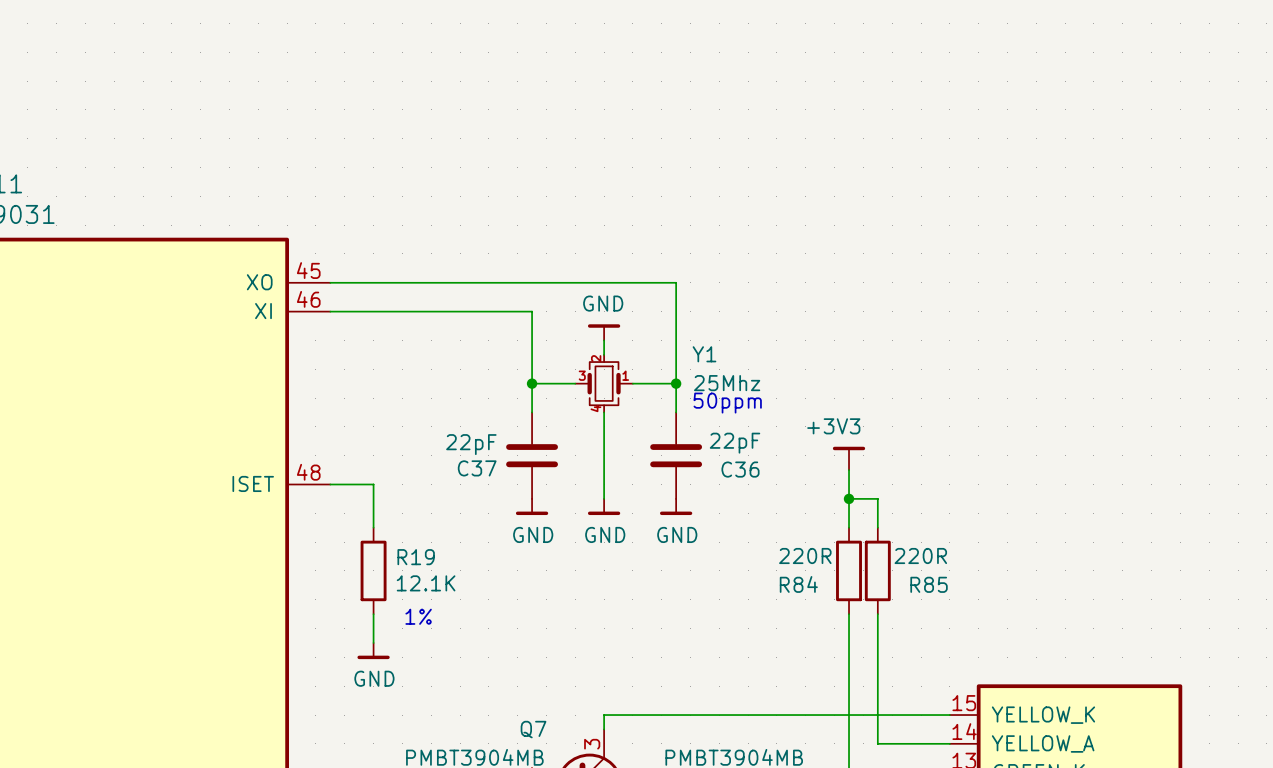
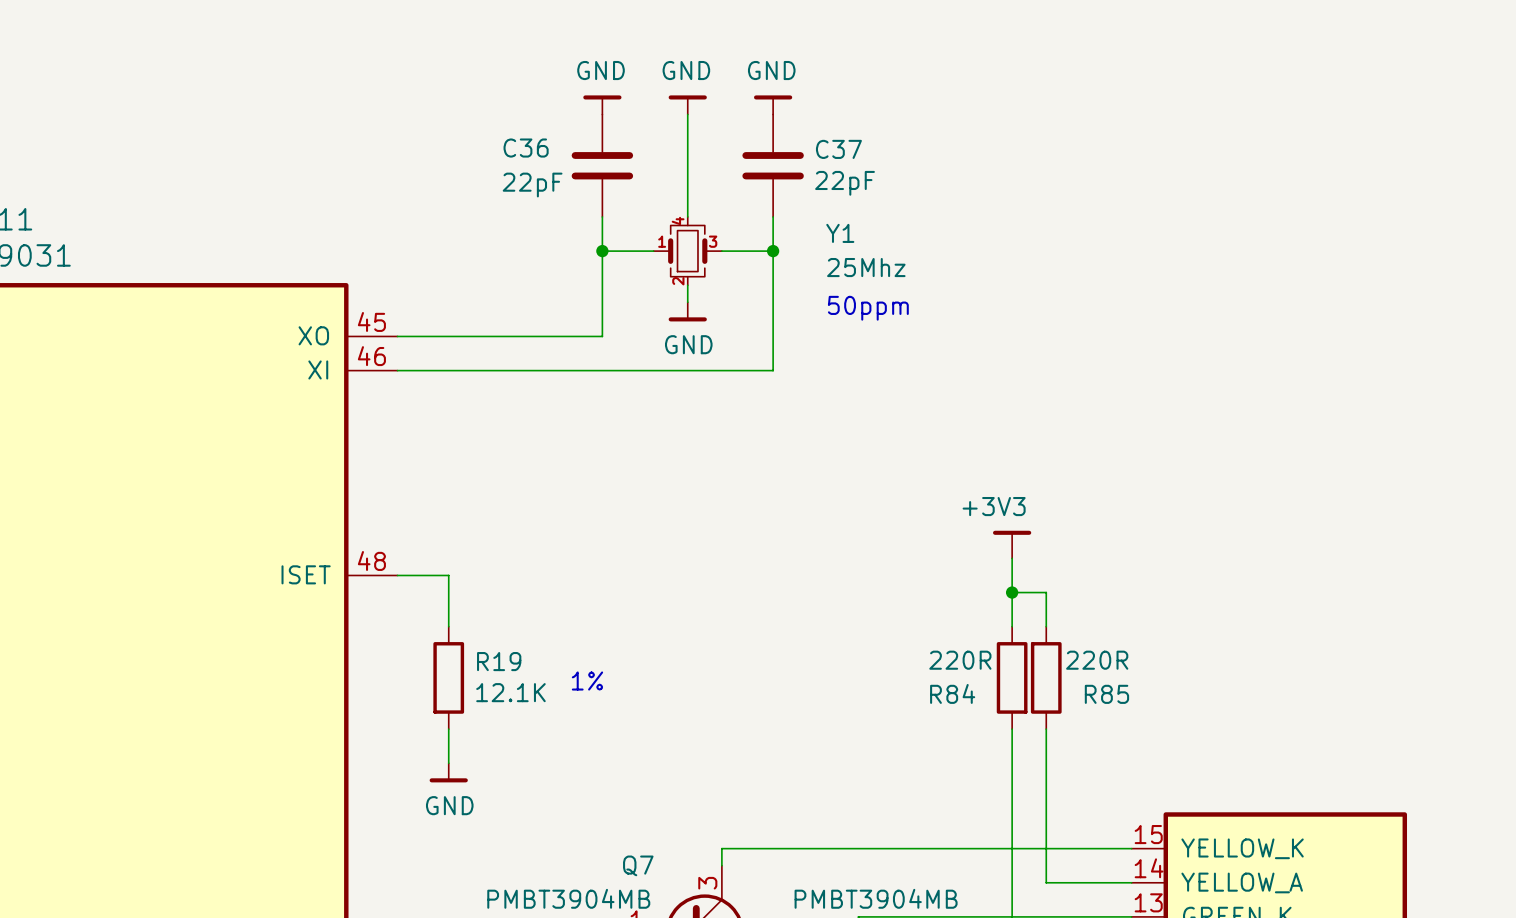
power symbol: none -> GND (602, 104)
power symbol: none -> GND (687, 104)
power symbol: none -> GND (773, 104)
wire: none -> (687, 114) (687, 216)
junction: none -> (602, 251)
junction: none -> (773, 251)
wire: (503, 282) (676, 282) (676, 412) -> (602, 336) (602, 216)
wire: (532, 311) (532, 412) -> (636, 370) (773, 370) (773, 216)
power symbol rotation: 0° (604, 332) -> 180° (687, 311)
power symbol position: GND (604, 332) -> GND (687, 311)
wire: (604, 340) (604, 354) -> (687, 285) (687, 302)
Y1 name position: Y1 (704, 354) -> Y1 (840, 233)
wire: (532, 383) (575, 383) -> (602, 251) (653, 251)
junction: (532, 383) -> none
Y1 rotation: 0° (604, 383) -> 180° (687, 251)
Y1 position: (604, 383) -> (687, 251)
wire: (632, 383) (676, 383) -> (721, 251) (773, 251)
junction: (676, 383) -> none
Y1 value position: 25Mhz (727, 383) -> 25Mhz (866, 267)
text position: 50ppm (727, 403) -> 50ppm (868, 308)
wire: (604, 412) (604, 498) -> none
C36 value position: 22pF (735, 443) -> 22pF (532, 185)
C37 value position: 22pF (471, 444) -> 22pF (845, 183)
C37 position: (532, 455) -> (773, 165)
C36 position: (676, 455) -> (602, 165)
C37 name position: C37 (477, 468) -> C37 (838, 149)
C36 name position: C36 (740, 469) -> C36 (526, 148)
power symbol: GND (532, 506) -> none
power symbol: GND (604, 506) -> none
power symbol: GND (676, 506) -> none
text position: 1% (418, 616) -> 1% (587, 681)

